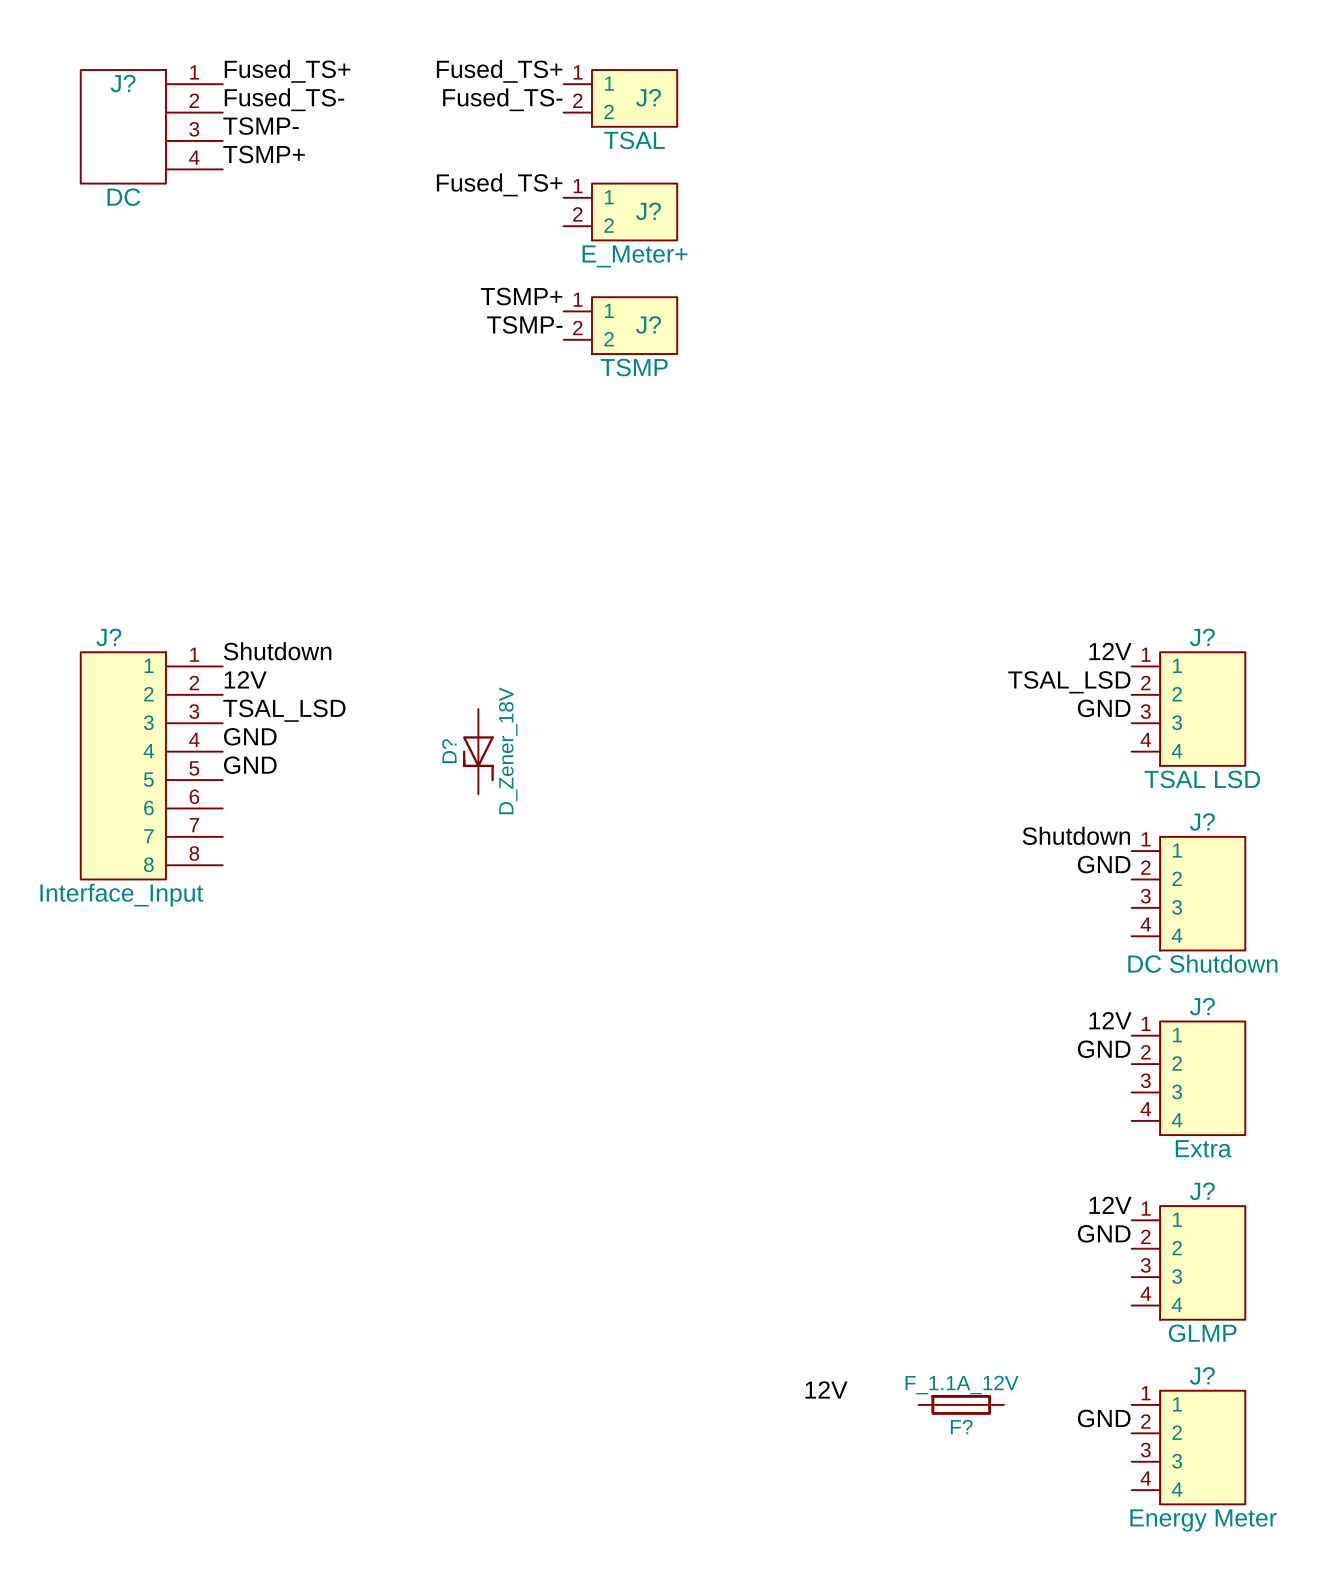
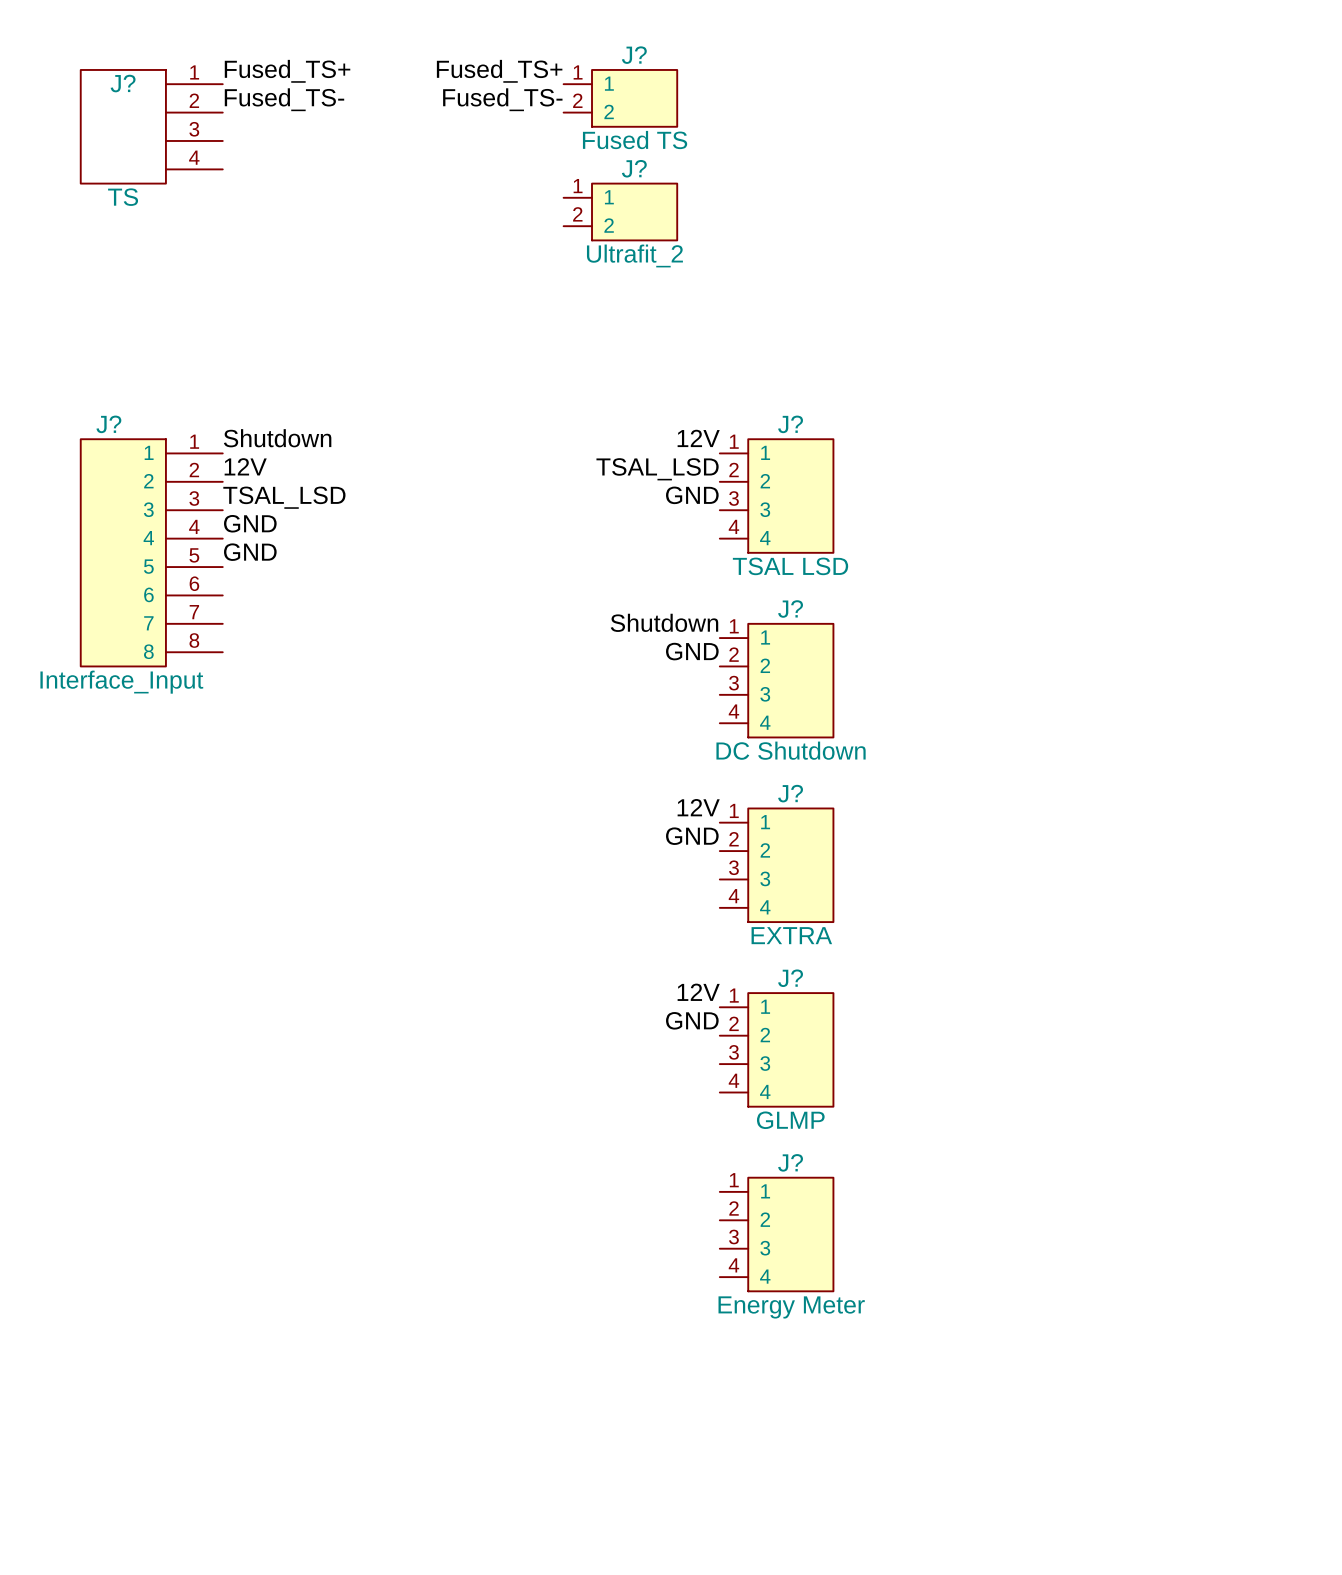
J? name position: J? (648, 97) -> J? (634, 55)
label: TSMP- (261, 126) -> none
J? value: TSAL (634, 140) -> Fused TS (635, 140)
label: TSMP+ (264, 154) -> none
label: Fused_TS+ (499, 184) -> none
J? value: DC (123, 197) -> TS (123, 197)
J? name position: J? (648, 211) -> J? (634, 168)
J? value: E_Meter+ (635, 256) -> Ultrafit_2 (634, 255)
label: TSMP+ (521, 296) -> none
label: TSMP- (524, 324) -> none
J?: TSMP (620, 325) -> none
label: none -> 12V (698, 438)
label: none -> TSAL_LSD (657, 469)
label: none -> GND (692, 495)
J?: none -> TSAL LSD (776, 496)
label: none -> GND (250, 523)
label: none -> GND (250, 552)
label: none -> Shutdown (664, 622)
label position: Shutdown (277, 651) -> Shutdown (277, 438)
label: none -> GND (692, 651)
label: 12V (1110, 651) -> none
label position: 12V (245, 679) -> 12V (245, 466)
J?: none -> DC Shutdown (776, 680)
label: TSAL_LSD (1069, 682) -> none
label: GND (1104, 708) -> none
J?: TSAL LSD (1188, 709) -> none
label position: TSAL_LSD (284, 710) -> TSAL_LSD (284, 497)
label: GND (250, 736) -> none
D?: D_Zener_18V (478, 751) -> none
J? position: (151, 765) -> (151, 552)
label: GND (250, 765) -> none
label: none -> 12V (698, 807)
label: Shutdown (1076, 835) -> none
label: none -> GND (692, 836)
label: GND (1104, 864) -> none
J?: none -> EXTRA (776, 865)
J?: DC Shutdown (1188, 893) -> none
label: none -> 12V (698, 992)
label: none -> GND (692, 1020)
label: 12V (1110, 1020) -> none
J?: none -> GLMP (776, 1049)
label: GND (1104, 1049) -> none
J?: Extra (1188, 1078) -> none
label: 12V (1110, 1205) -> none
label: GND (1104, 1233) -> none
J?: none -> Energy Meter (776, 1234)
J?: GLMP (1188, 1262) -> none
label: 12V (826, 1389) -> none
F?: F_1.1A_12V (961, 1404) -> none
label: GND (1104, 1418) -> none
J?: Energy Meter (1188, 1447) -> none

